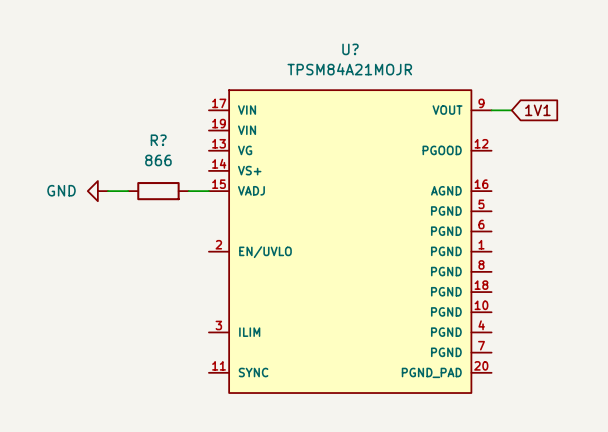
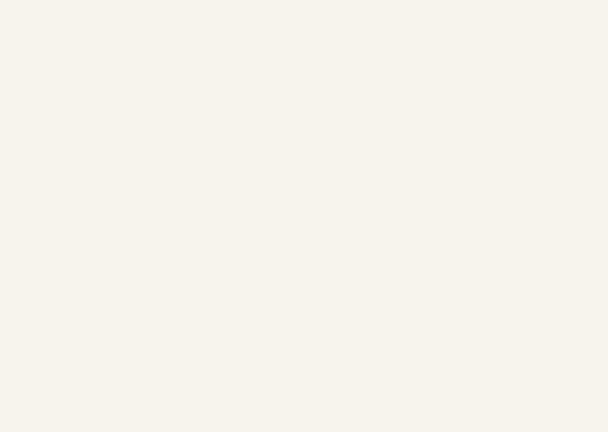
wire: (491, 110) (511, 110) -> none
global label: 1V1 (537, 110) -> none
power symbol: GND (97, 191) -> none
wire: (107, 191) (128, 191) -> none
R?: 866 (158, 191) -> none
wire: (188, 191) (208, 191) -> none
U?: TPSM84A21MOJR (350, 241) -> none

